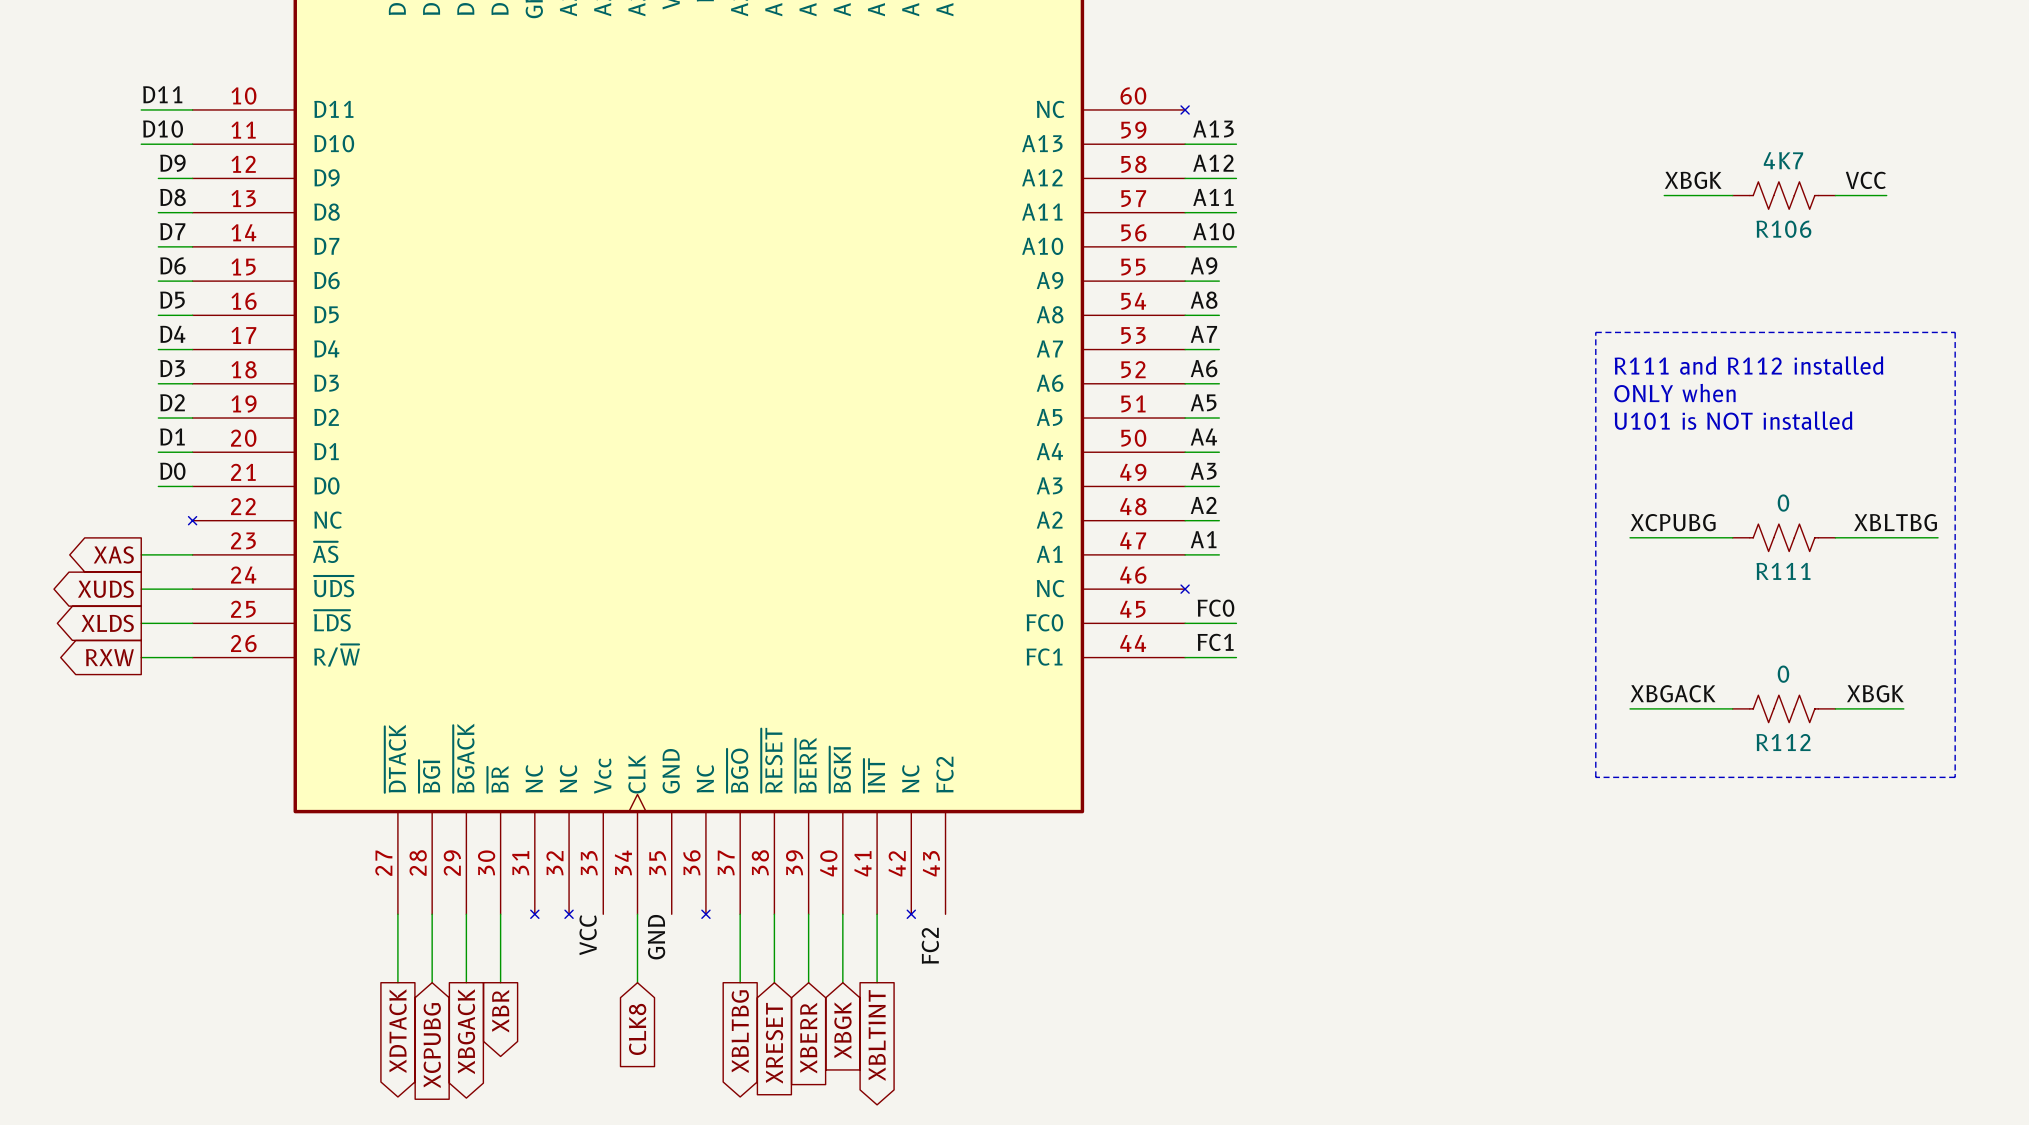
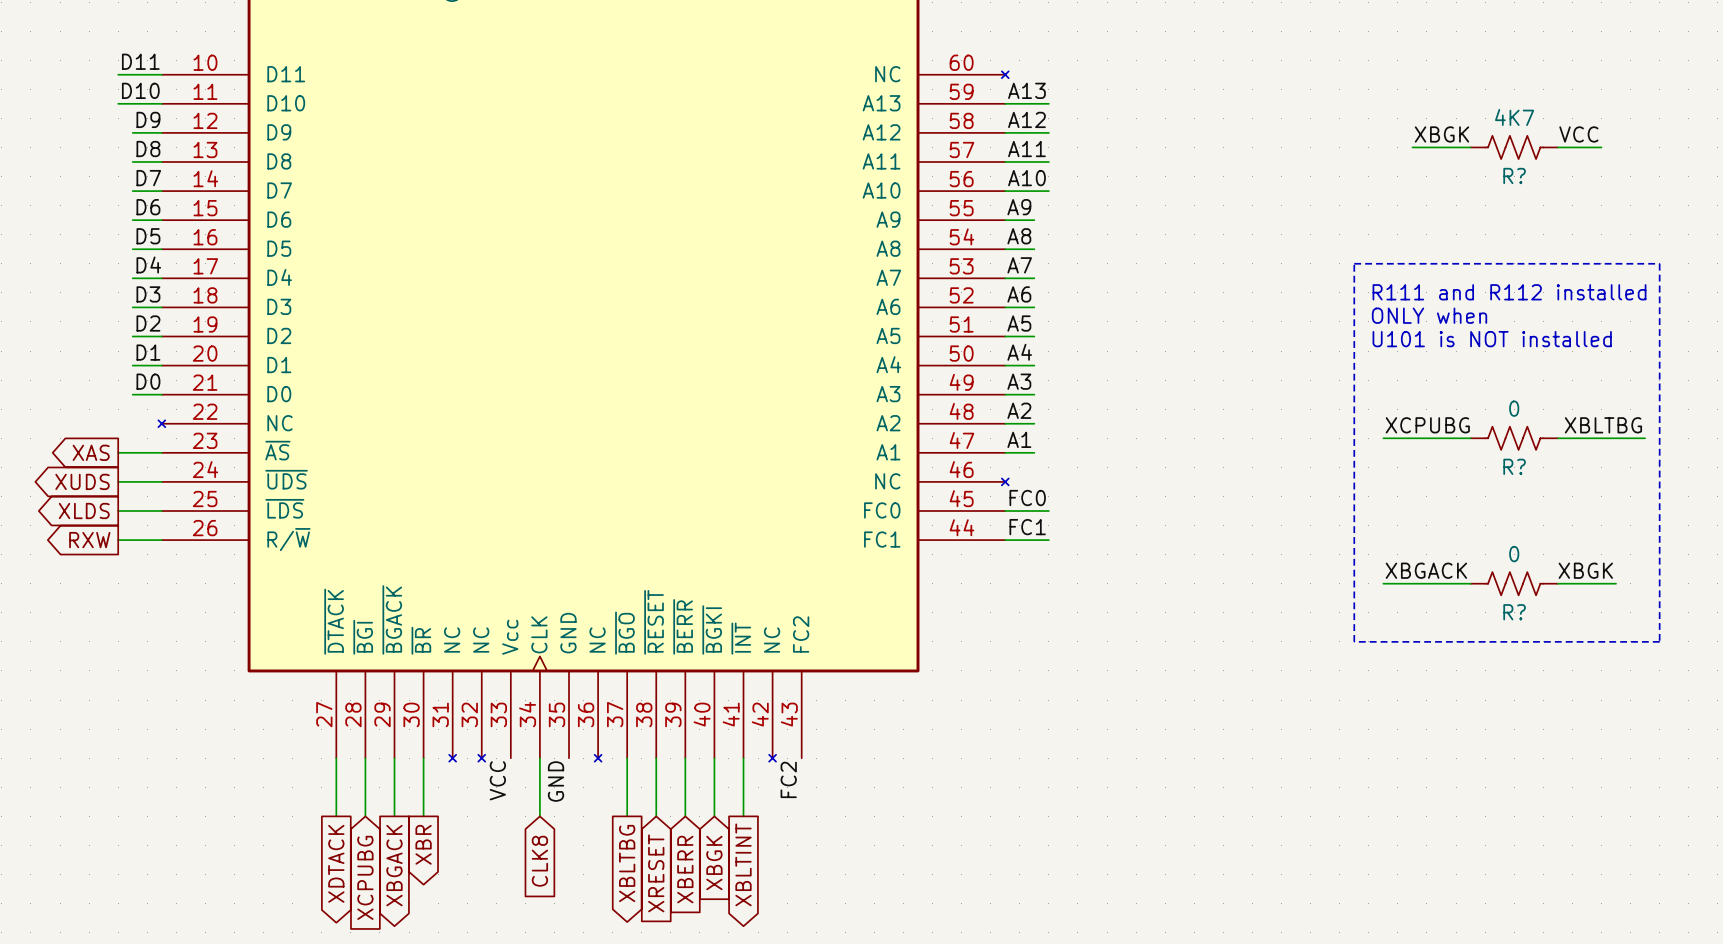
R106 name: R106 (1783, 229) -> R? (1514, 175)
R111 name: R111 (1783, 571) -> R? (1514, 466)
R112 name: R112 (1783, 742) -> R? (1514, 612)

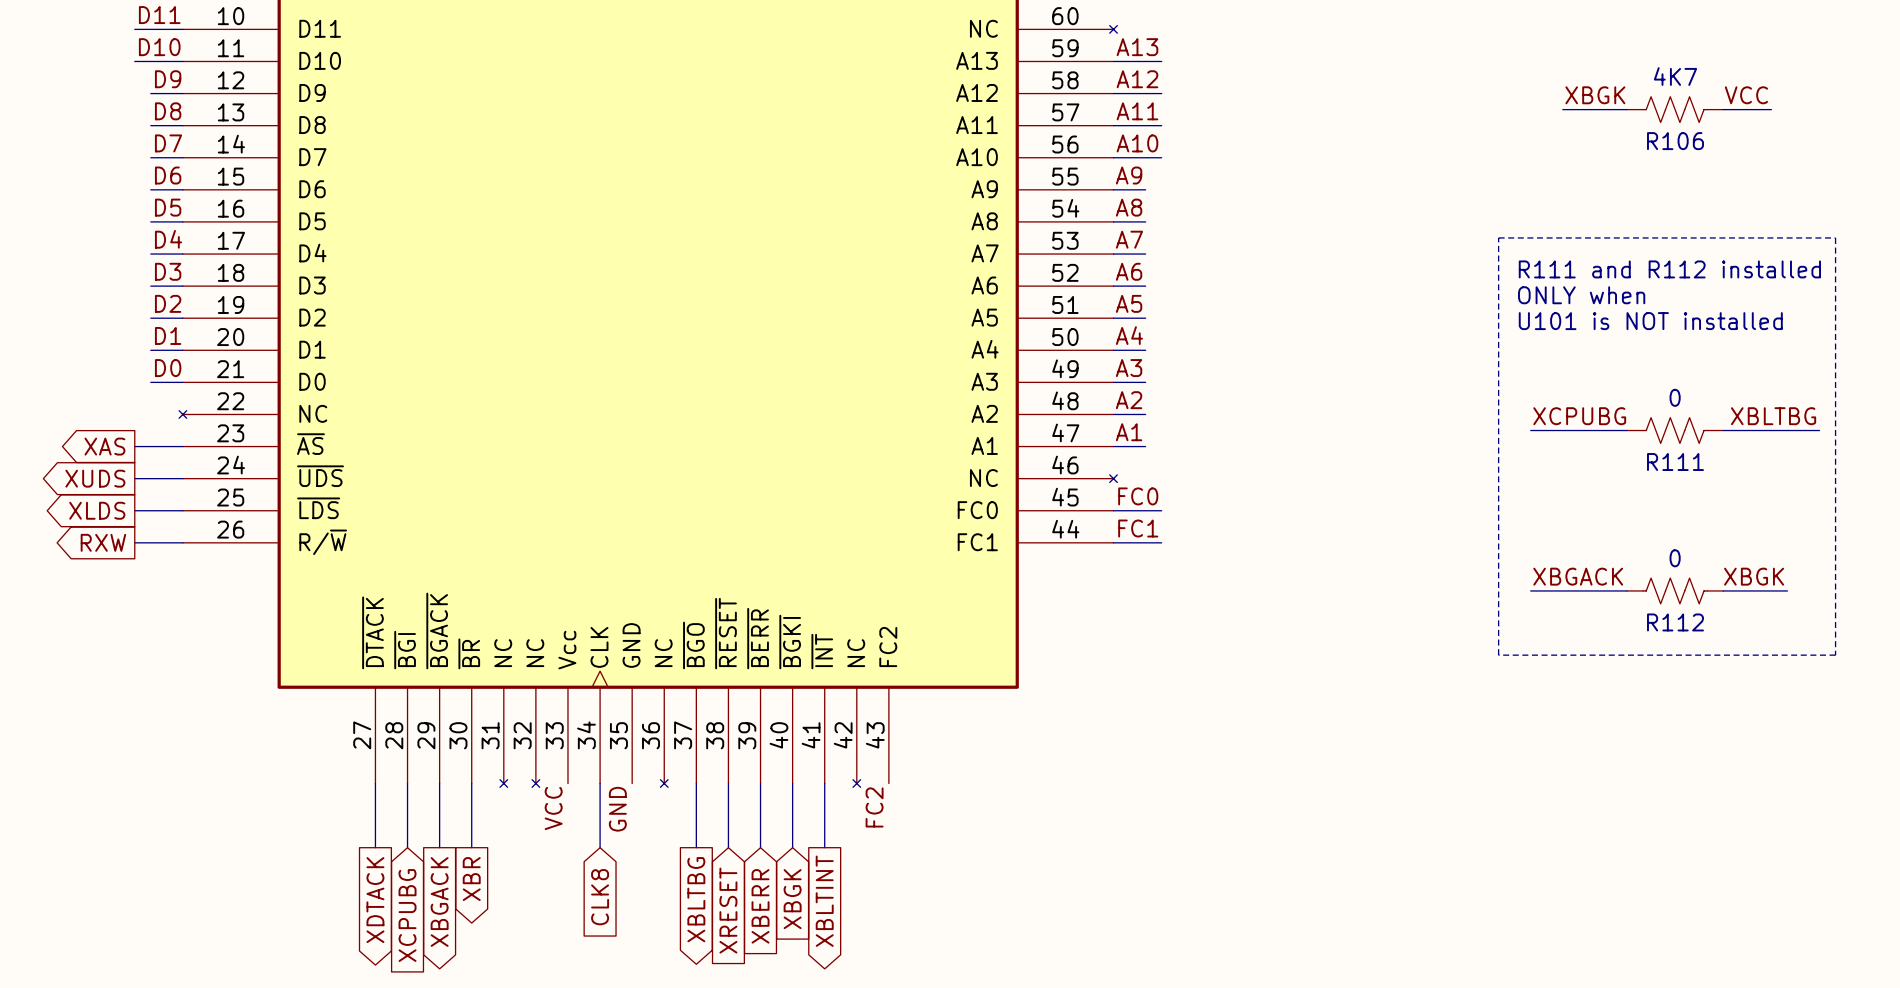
R? name: R? (1514, 175) -> R106 (1675, 141)
R? name: R? (1514, 466) -> R111 (1675, 462)
R? name: R? (1514, 612) -> R112 (1675, 622)

